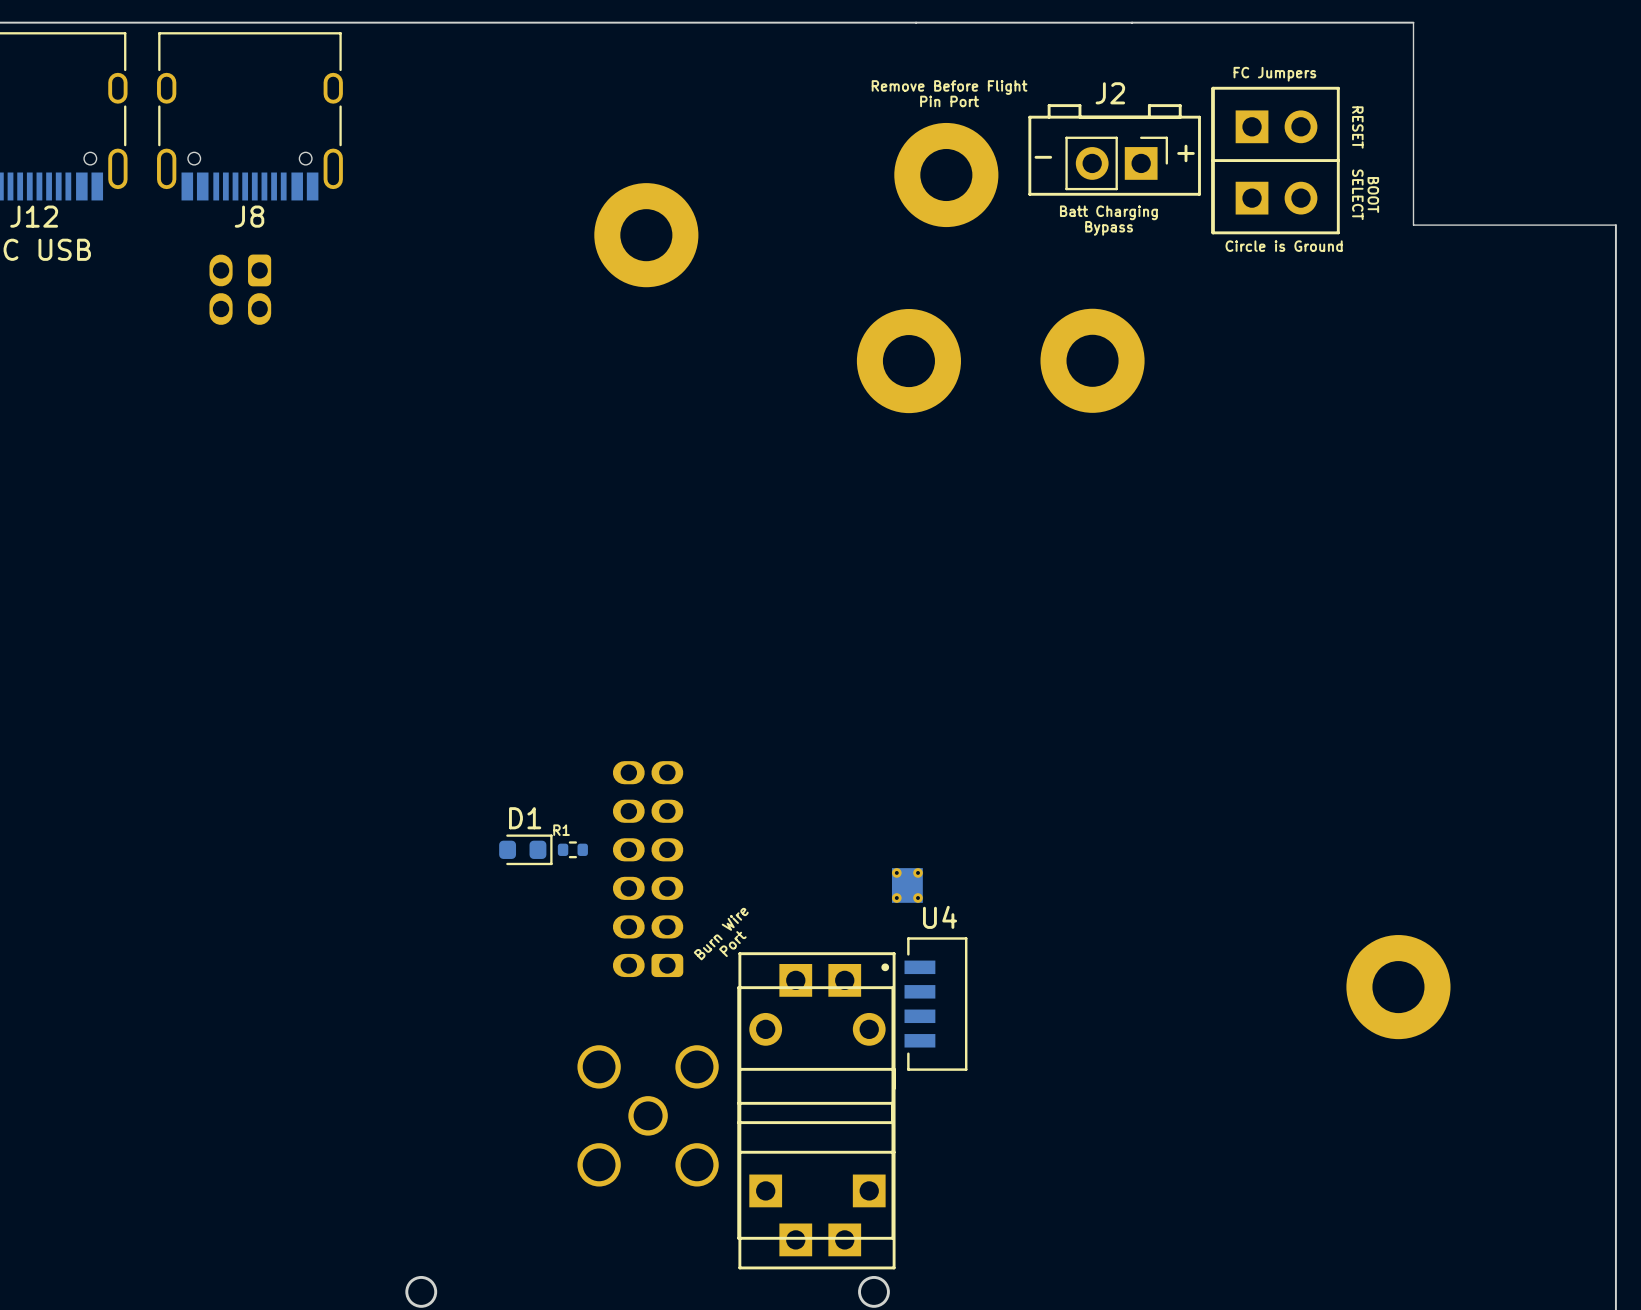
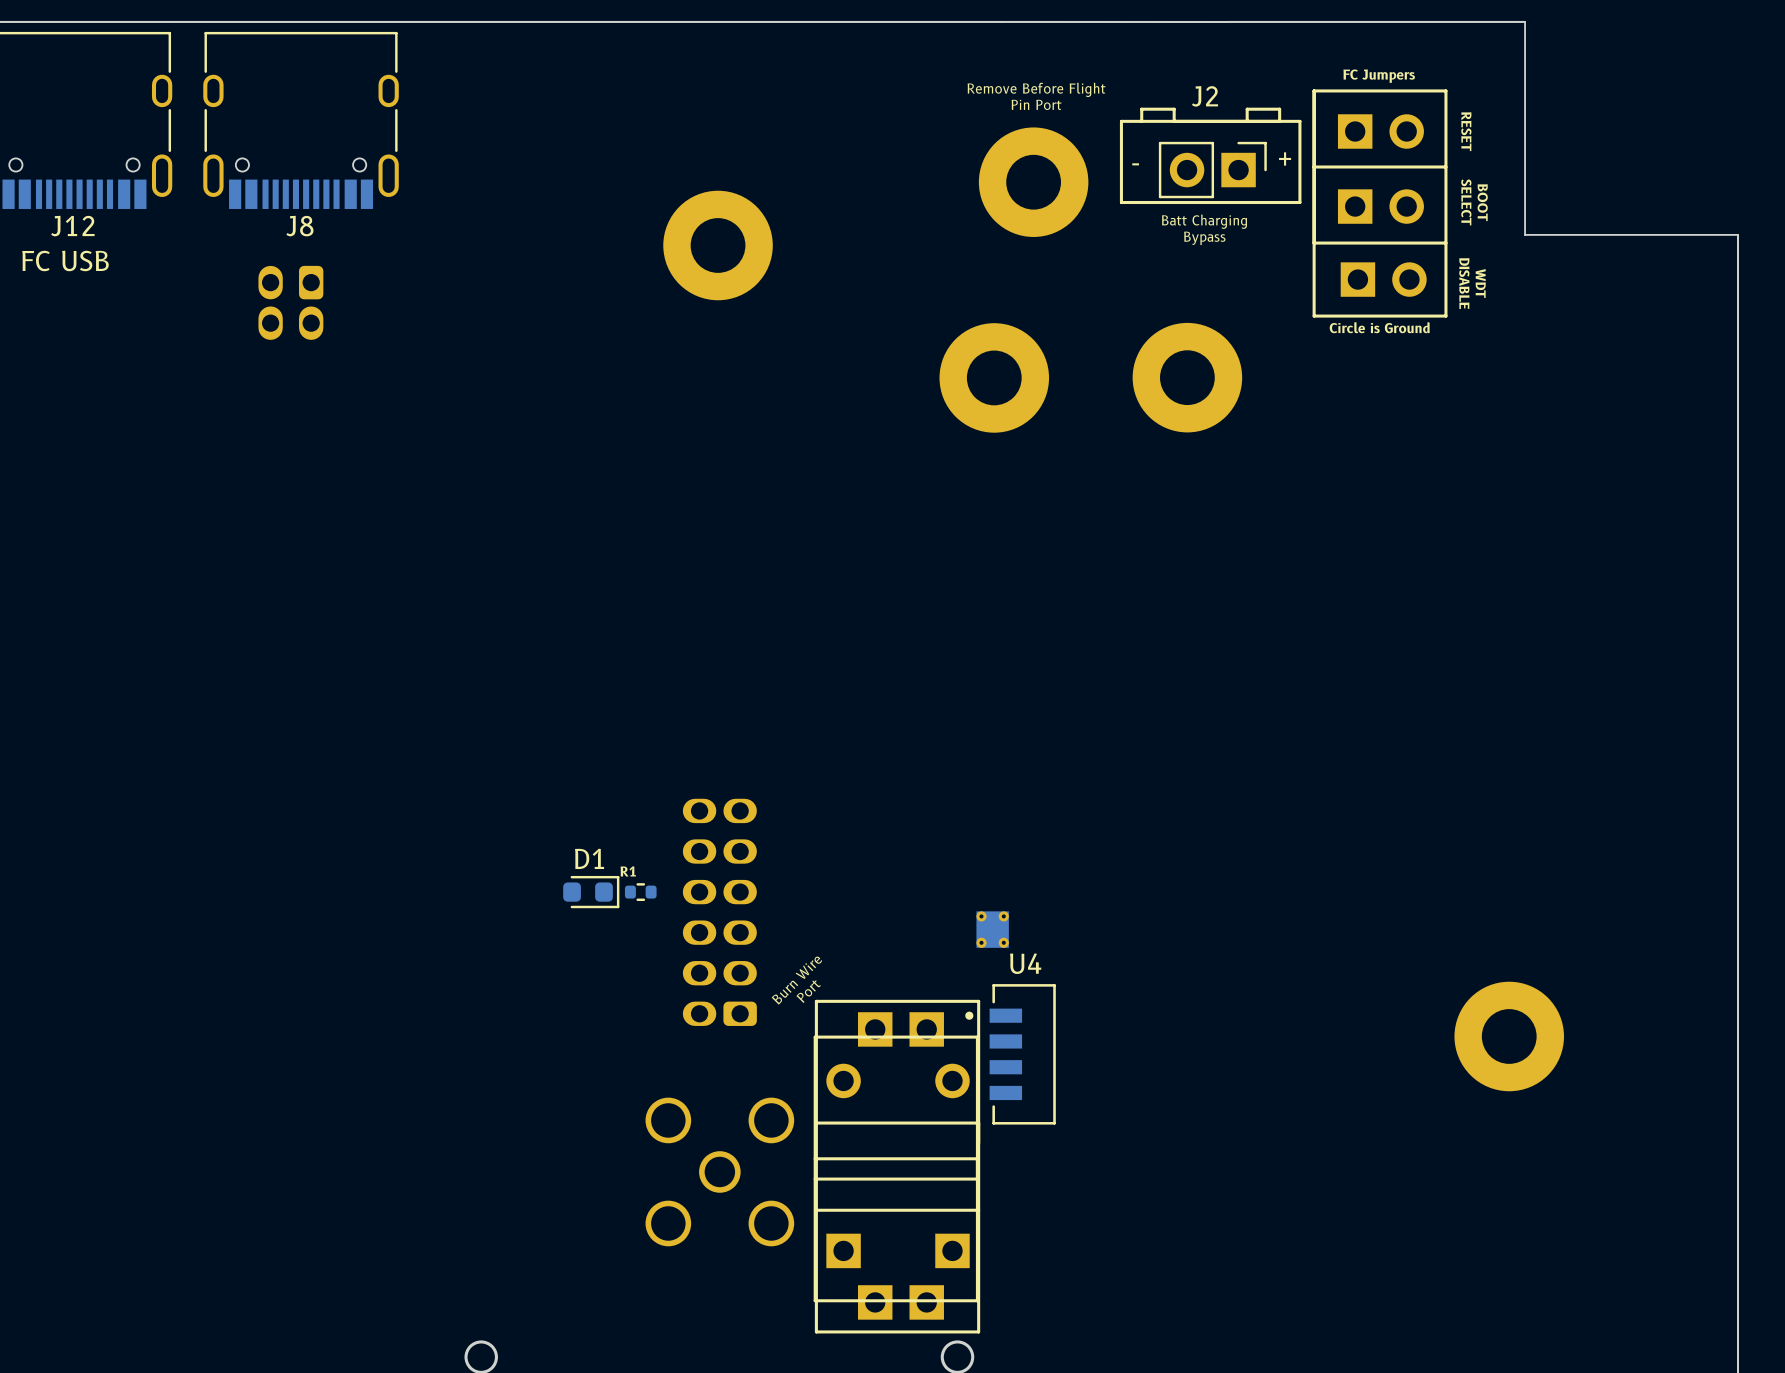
line: none -> (1445, 243) (1445, 316) (1314, 316) (1314, 243)
text position: Circle is Ground (1284, 246) -> Circle is Ground (1379, 327)
part: none -> (1383, 279)
text: none -> DISABLE (1464, 283)
text: none -> WDT (1480, 283)

